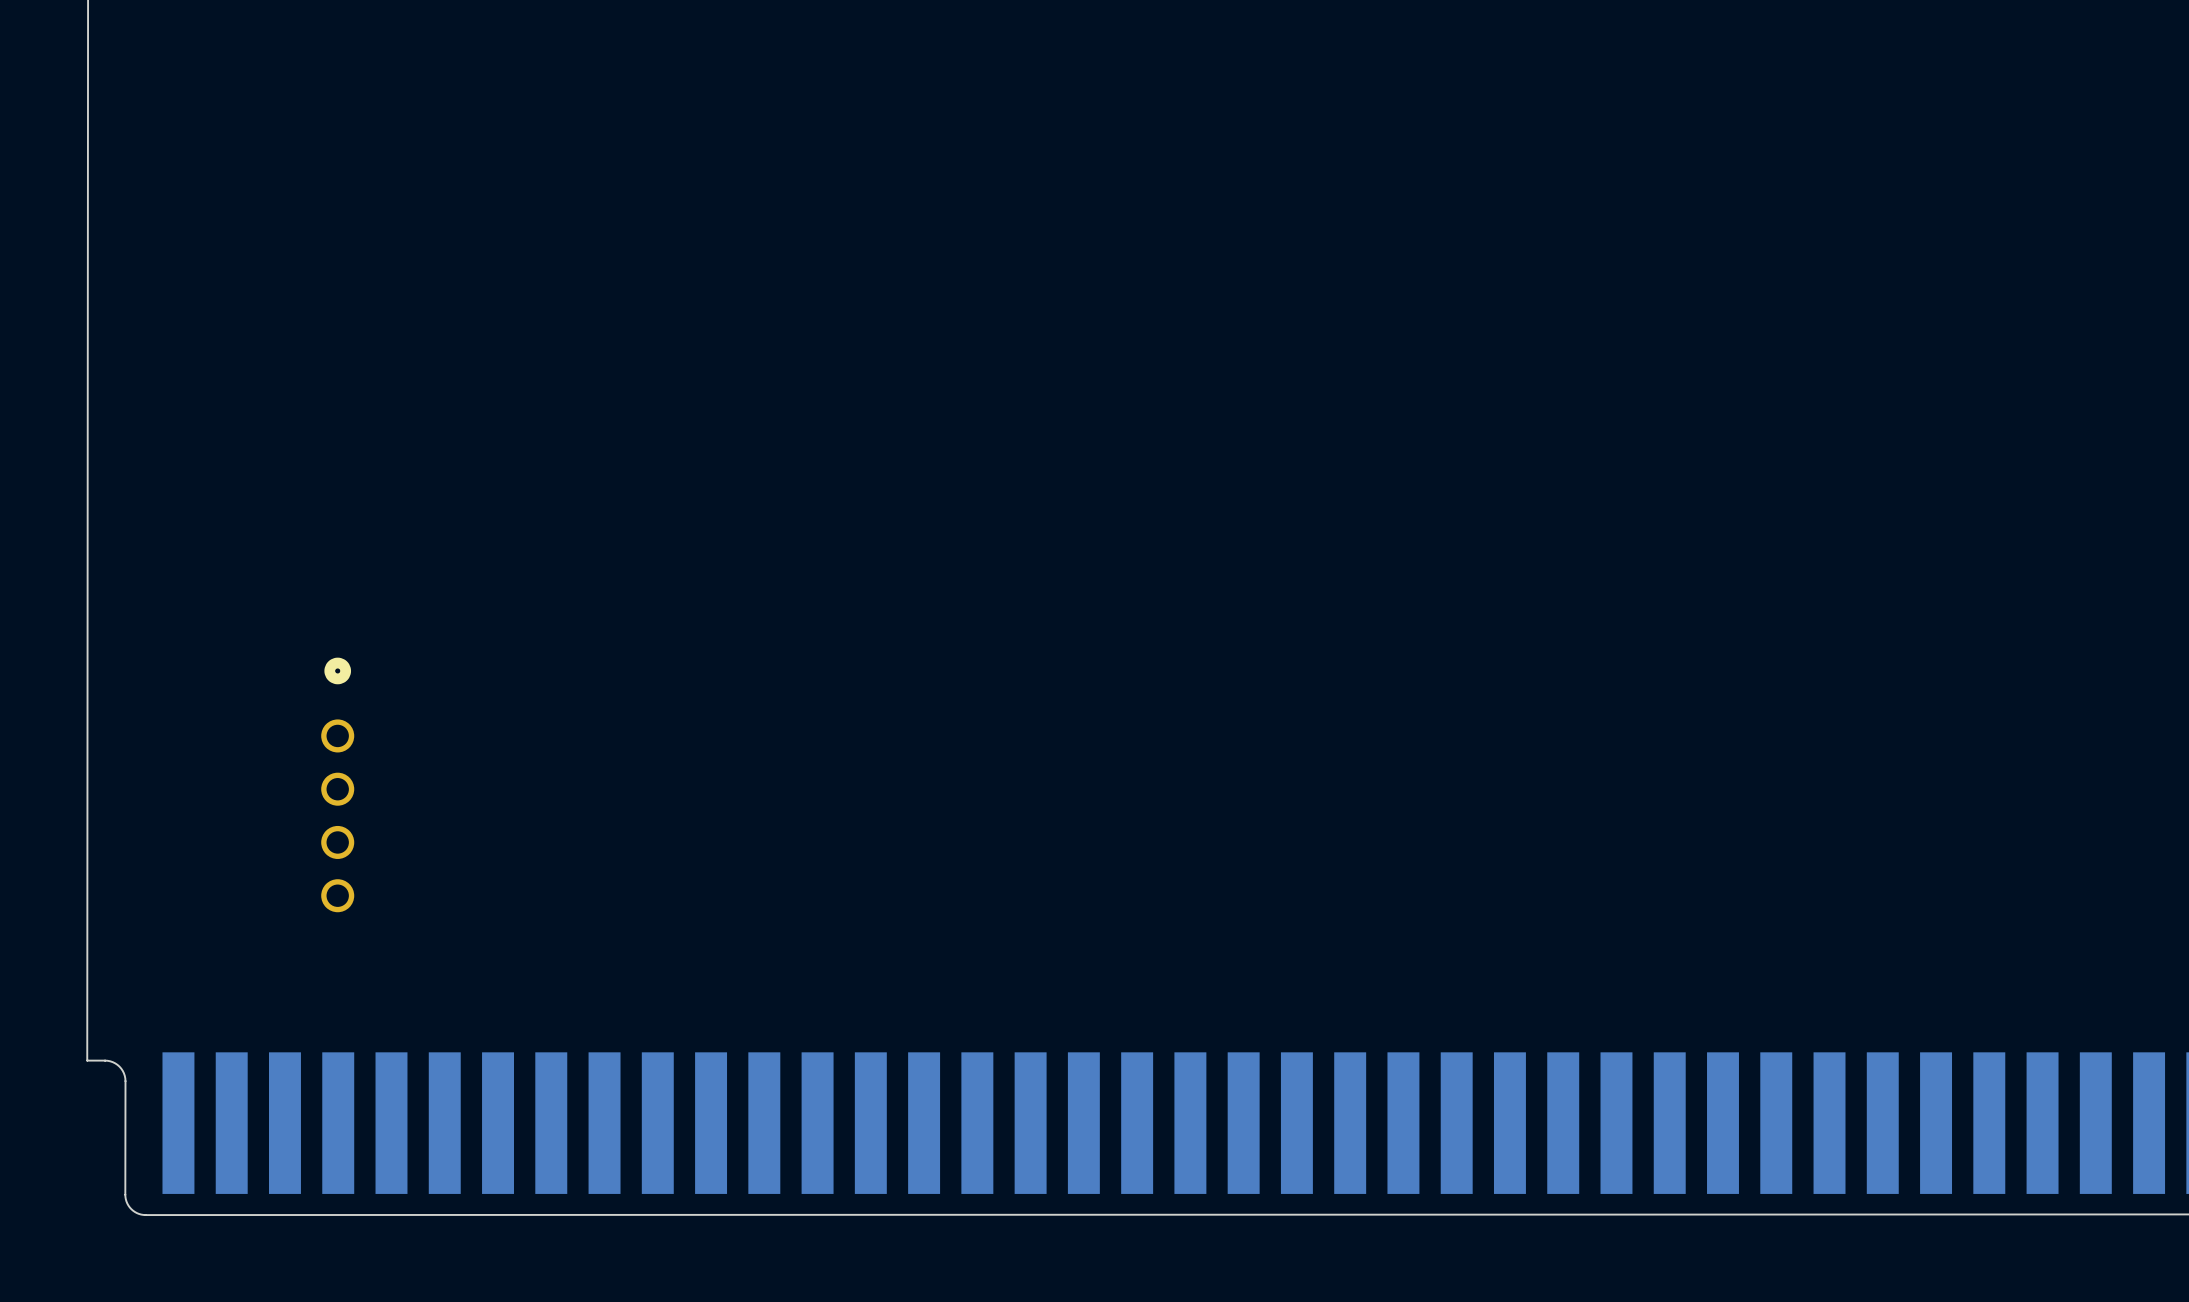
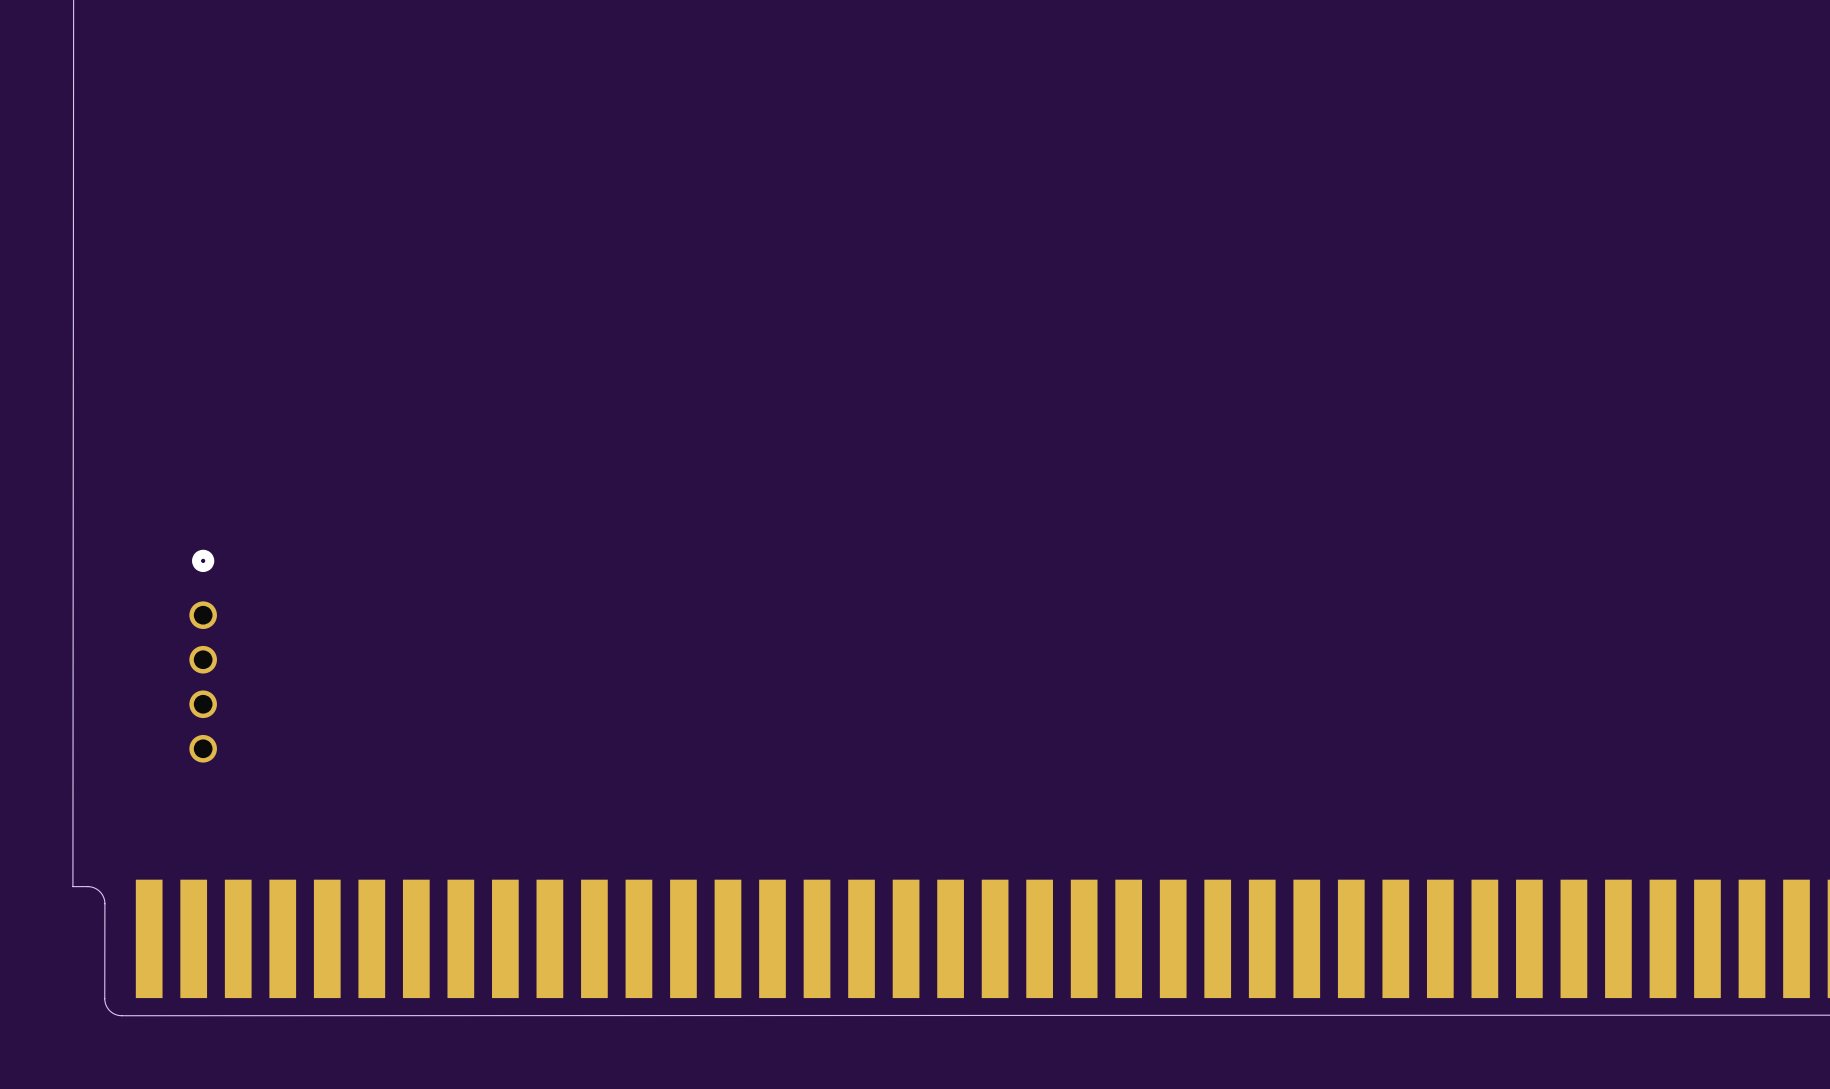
part position: (337, 784) -> (203, 656)

